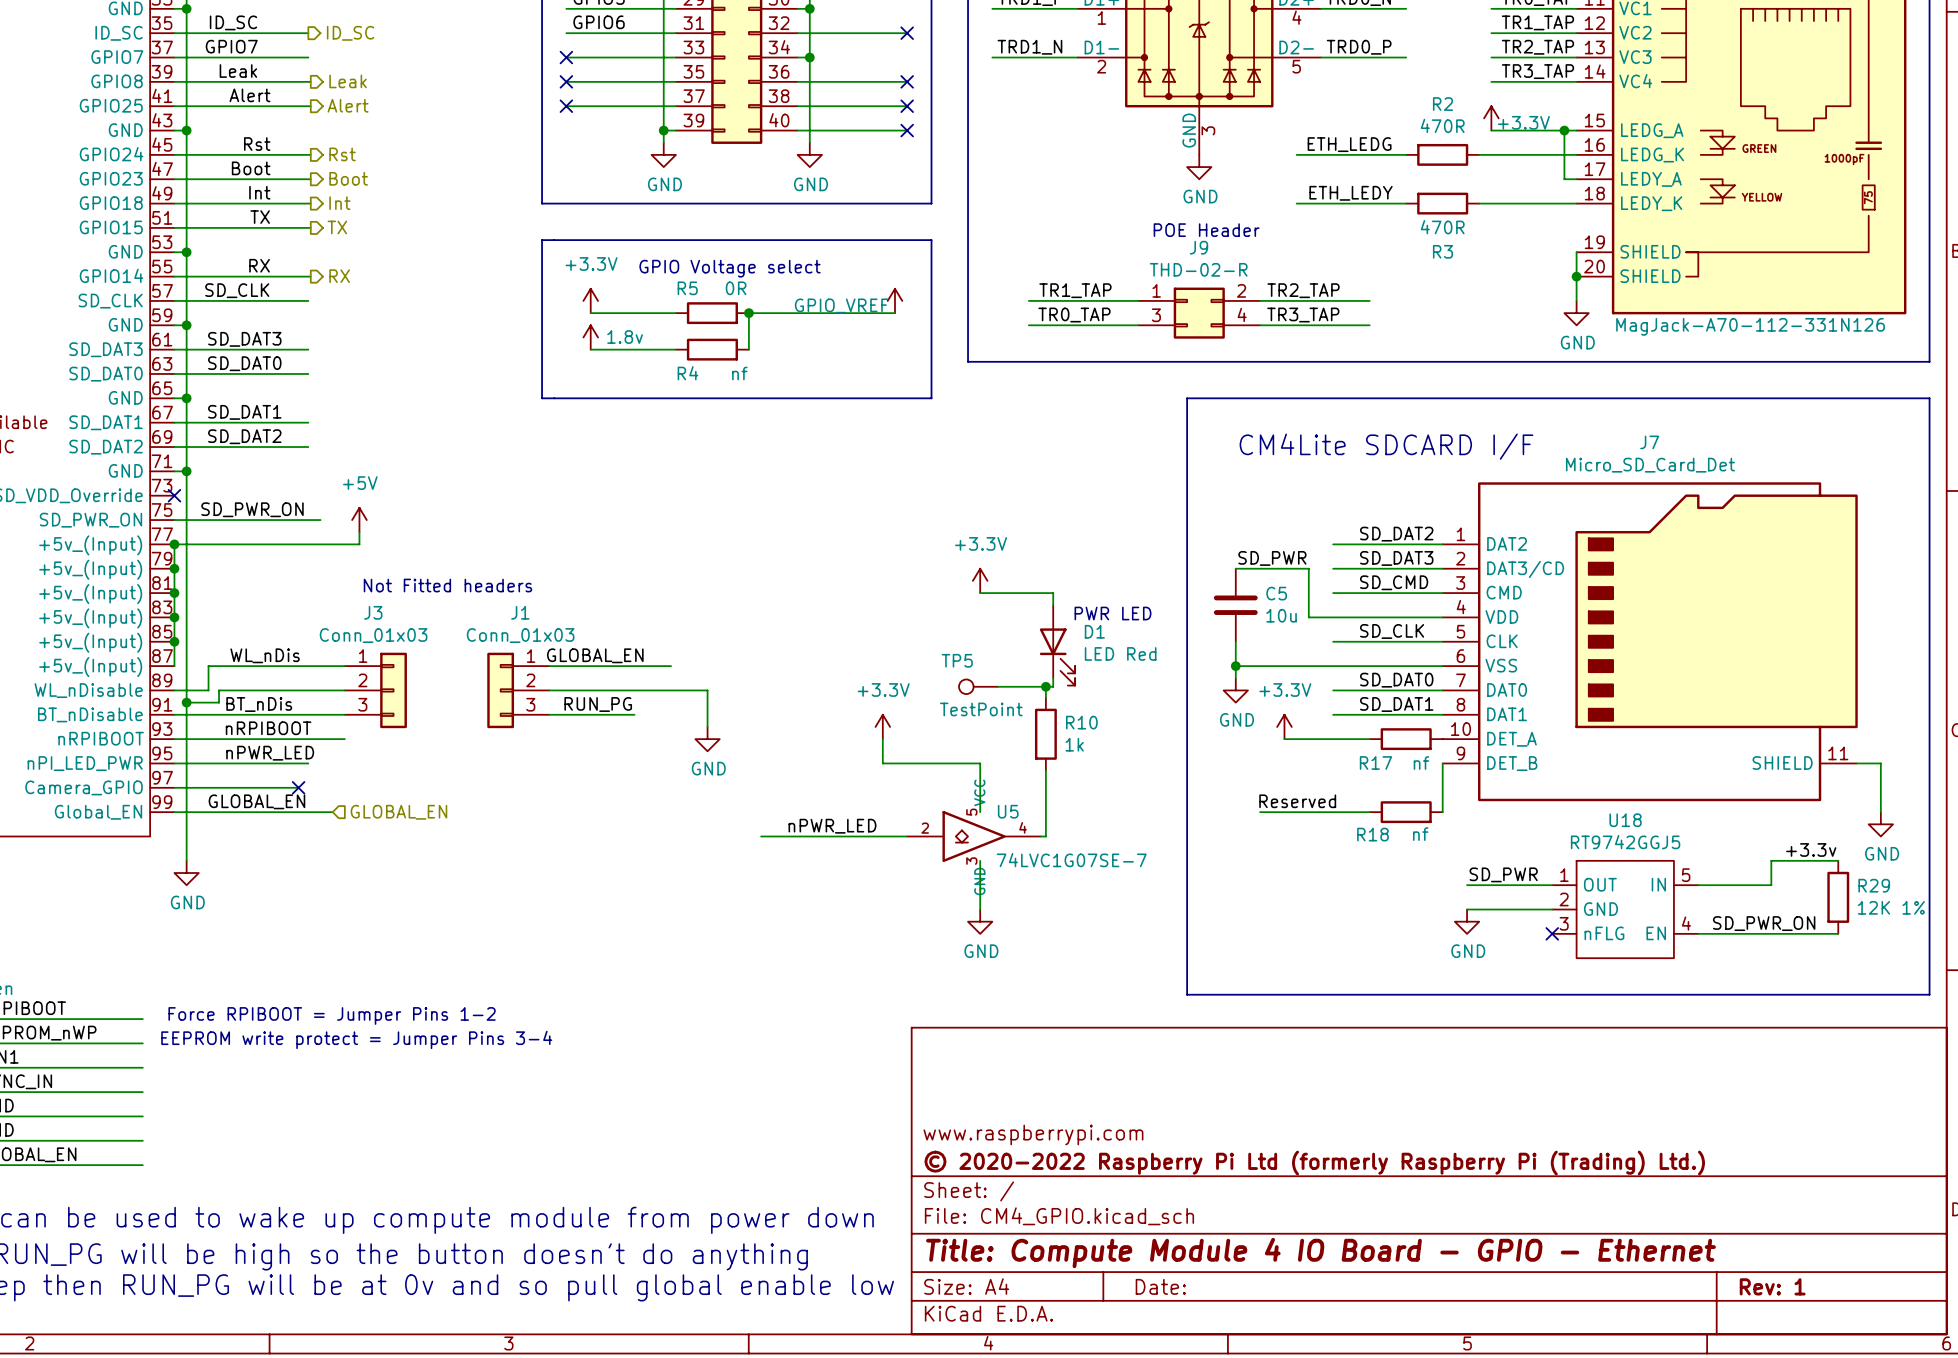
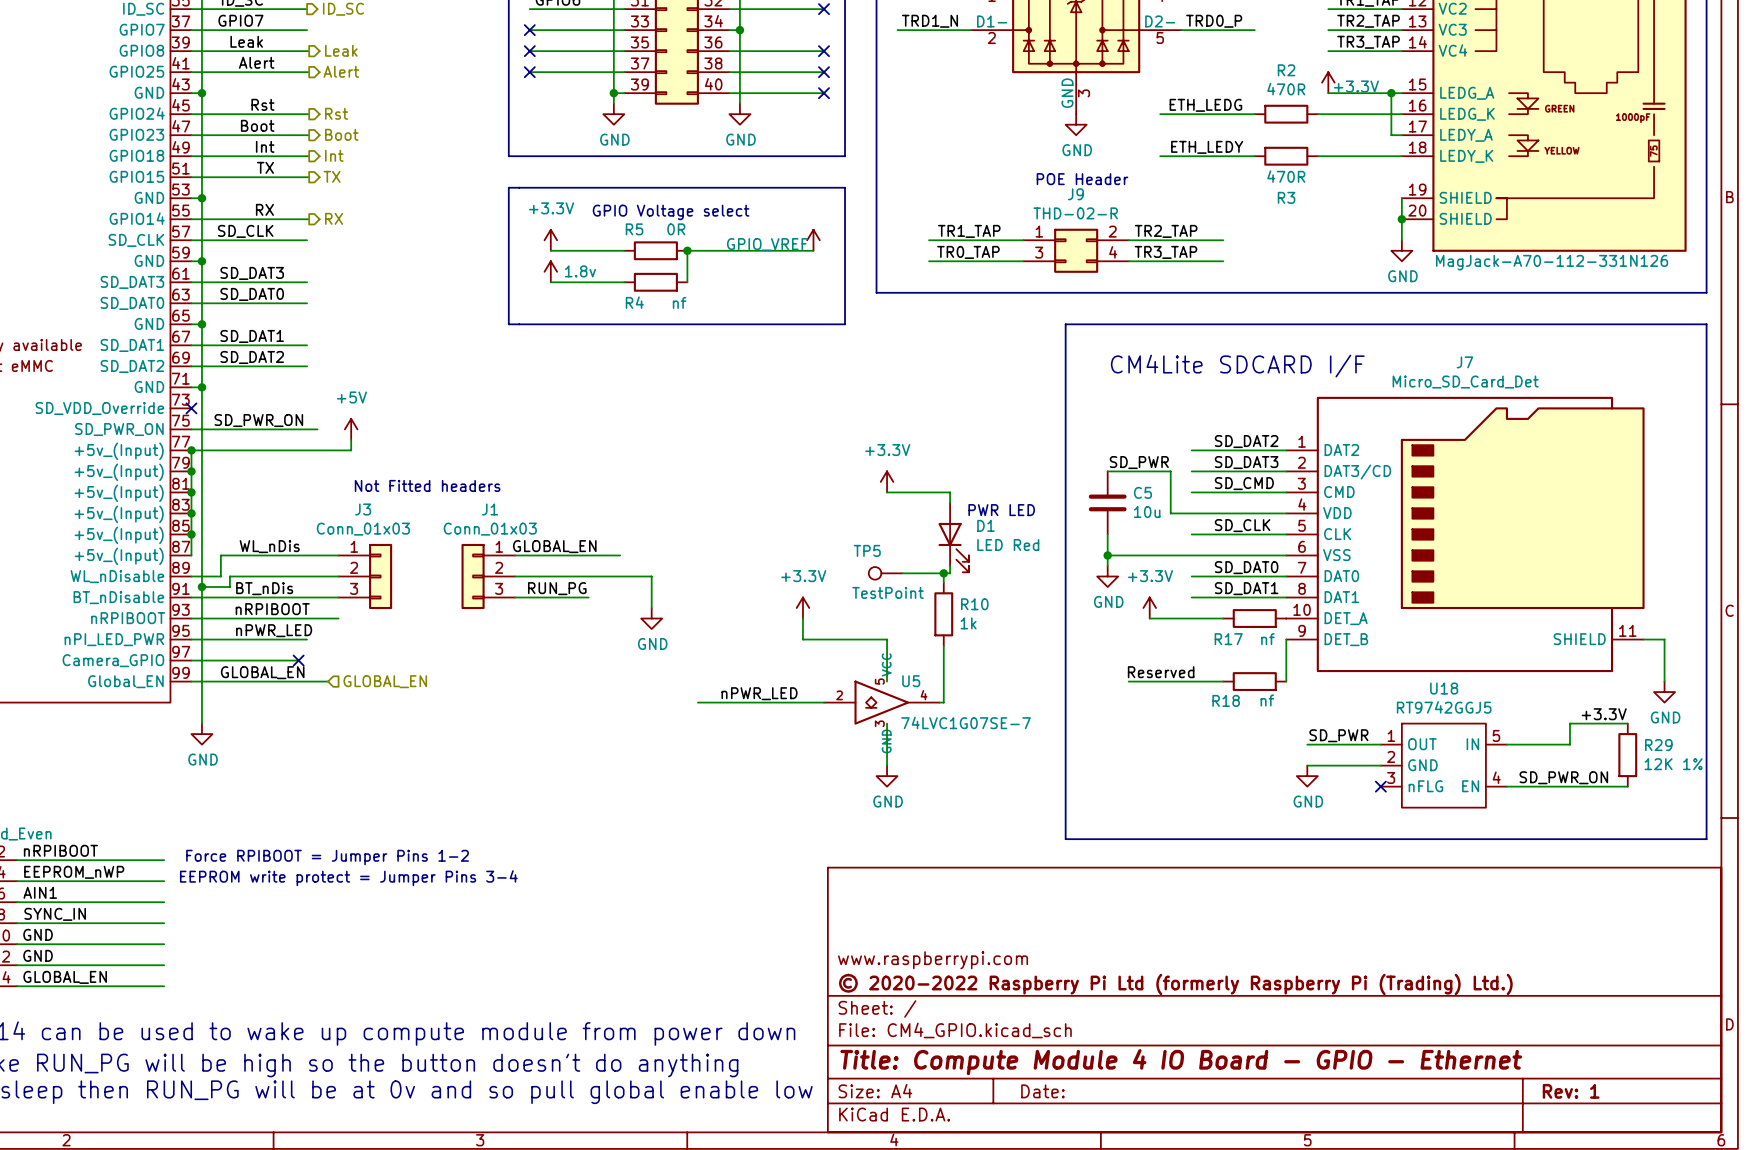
label: +3.3v (1811, 849) -> +3.3V (1604, 714)

